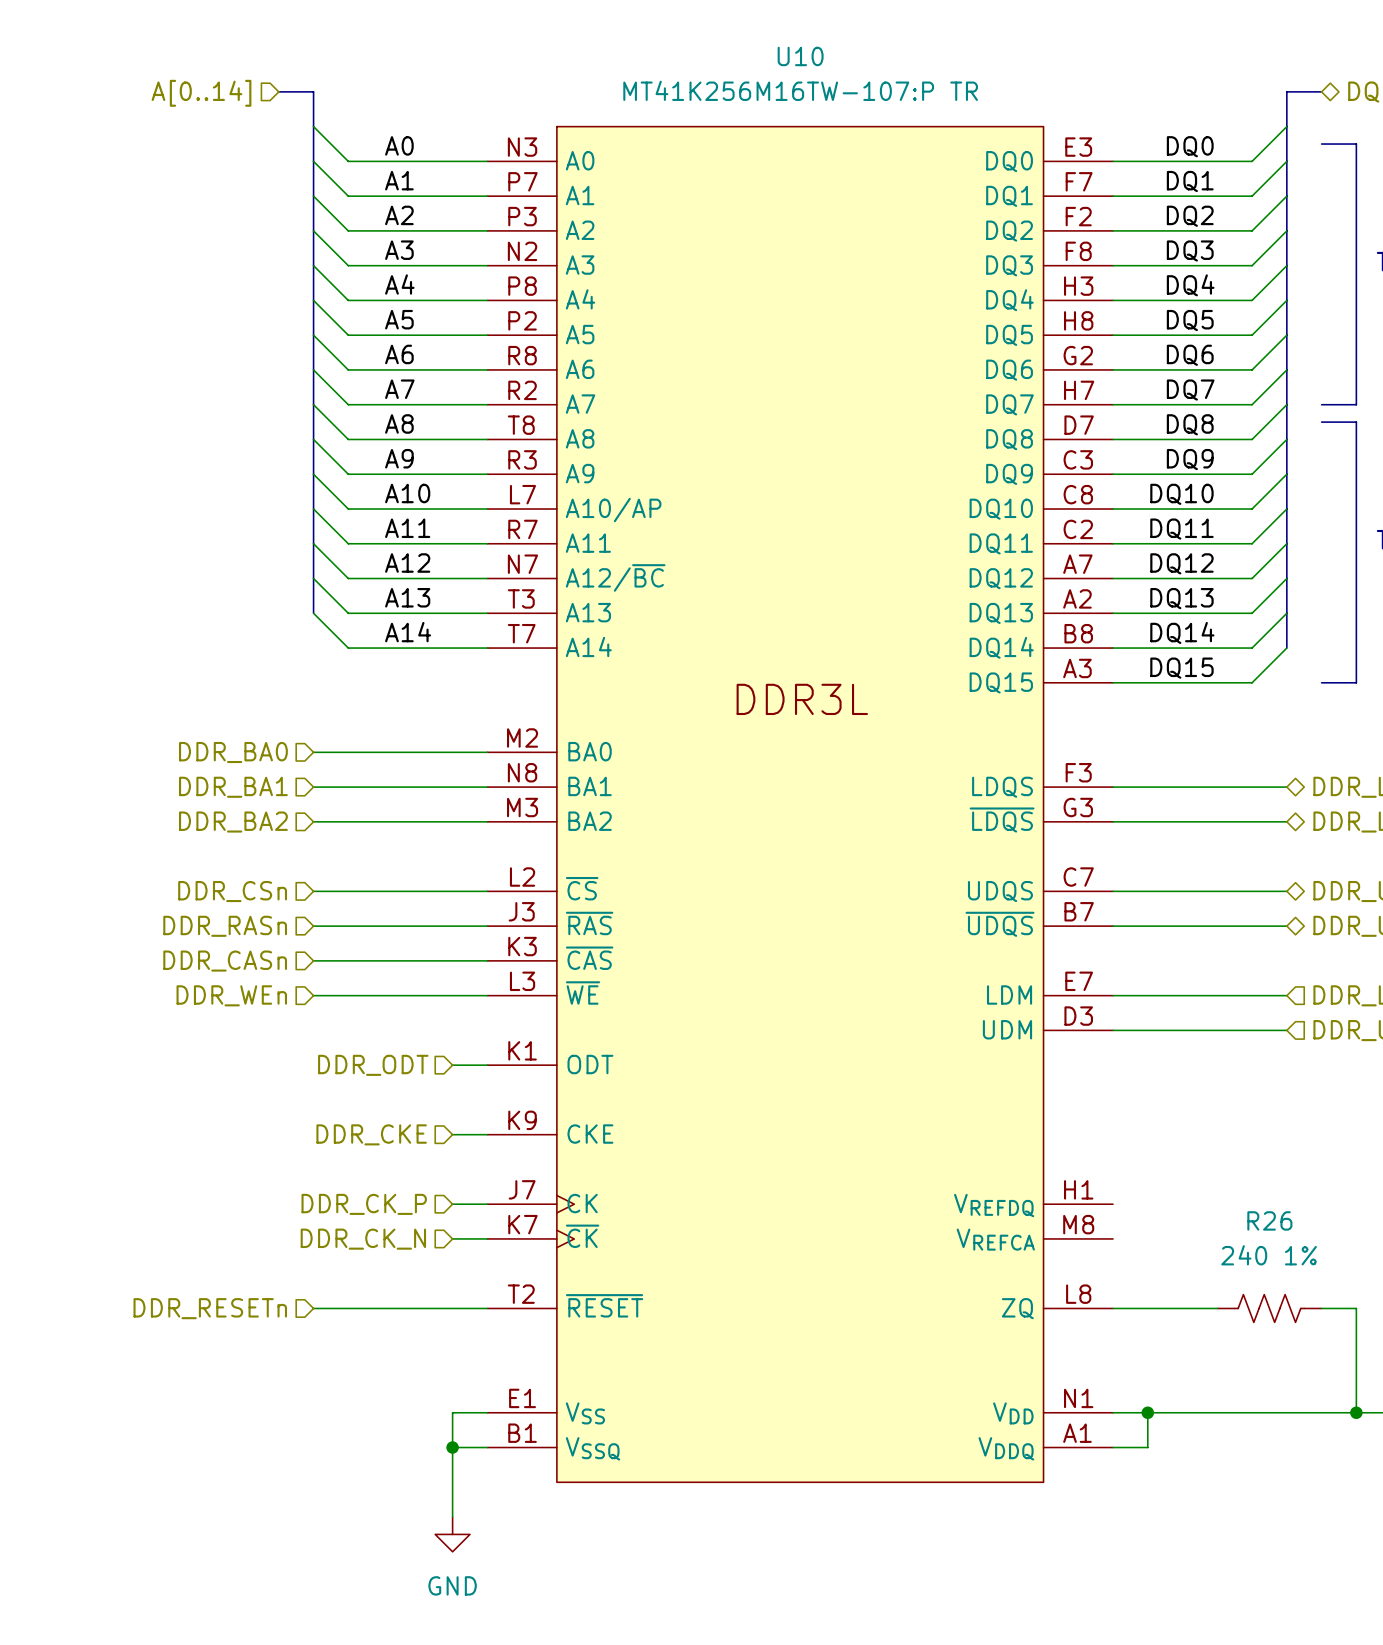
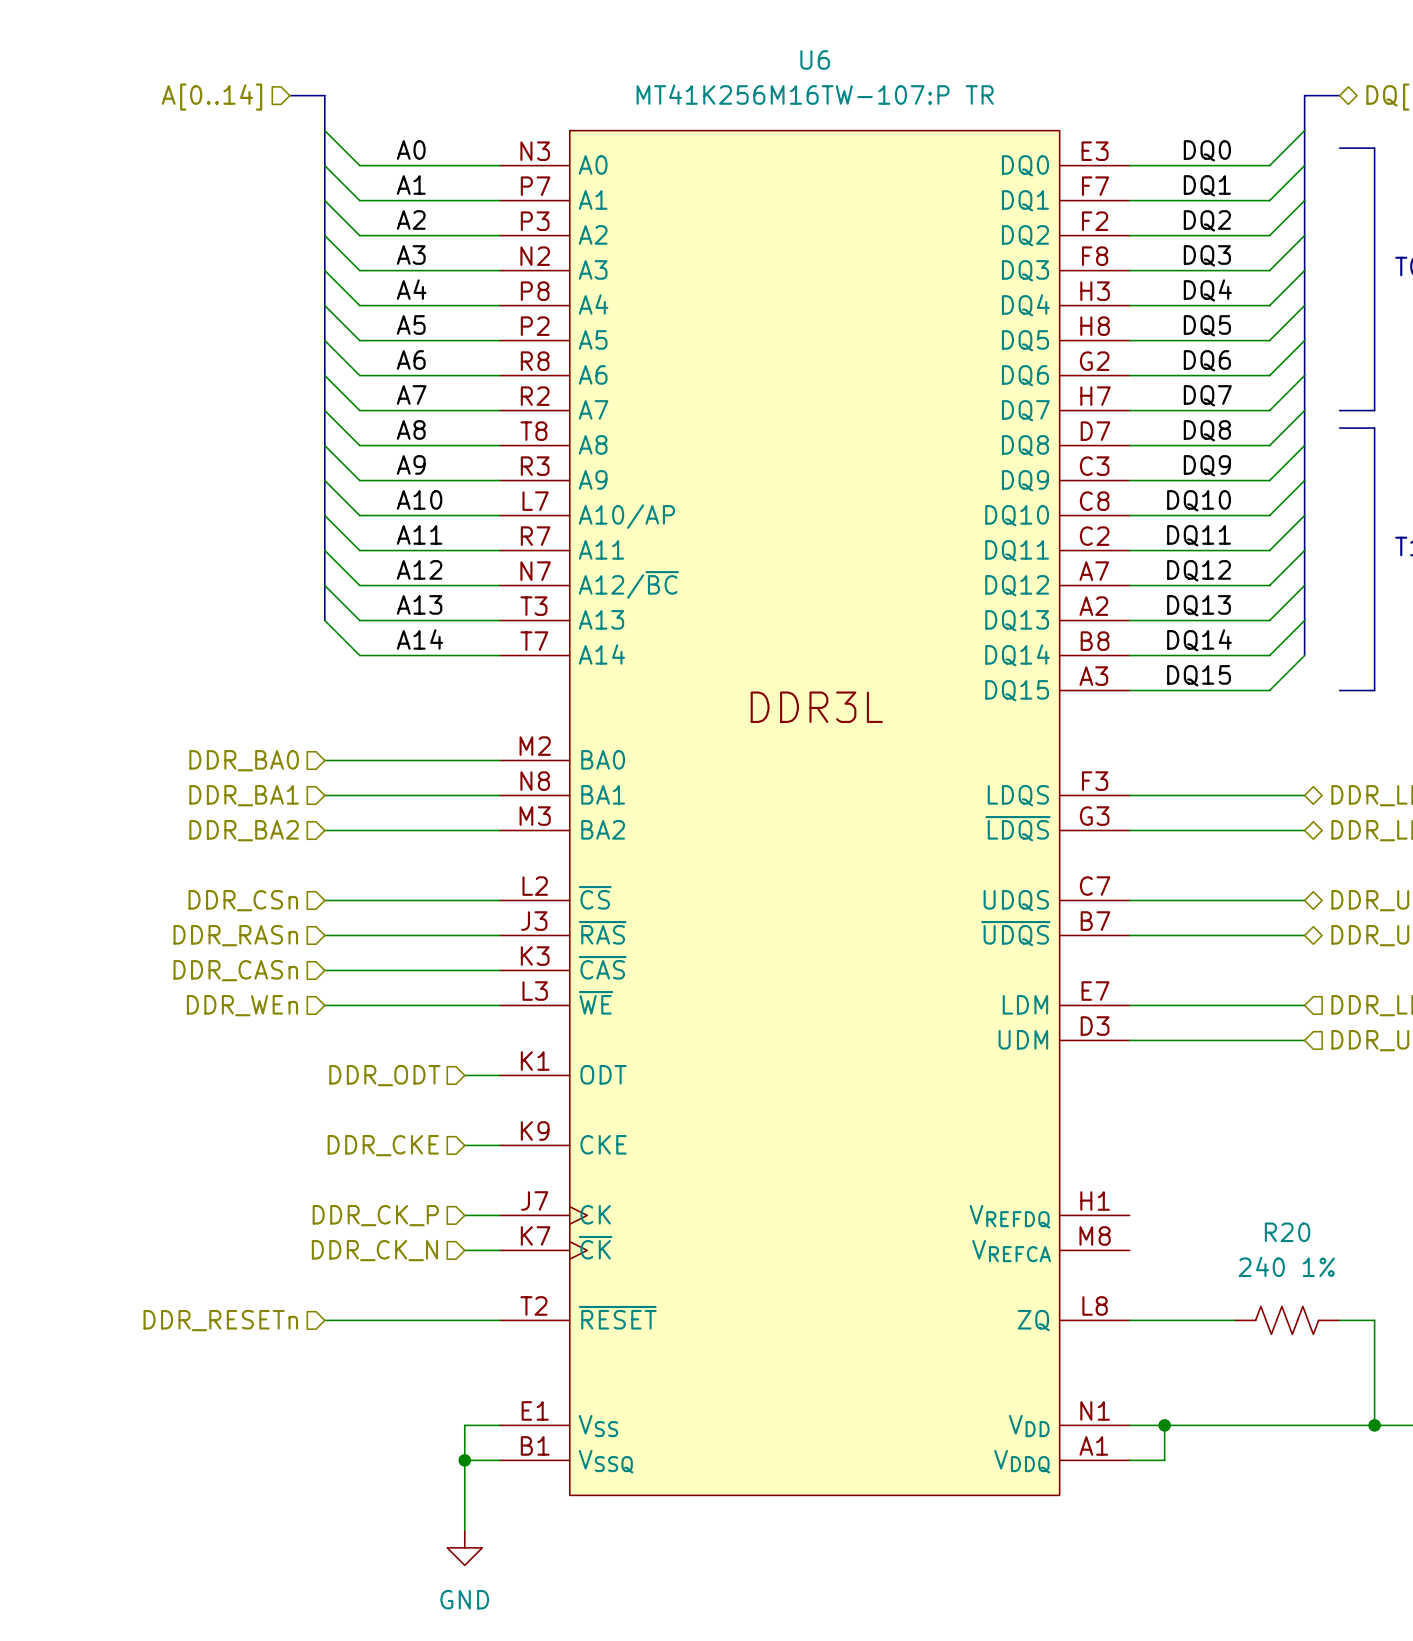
U10 name: U10 (800, 56) -> U6 (815, 59)
R26 name: R26 (1269, 1220) -> R20 (1287, 1232)

